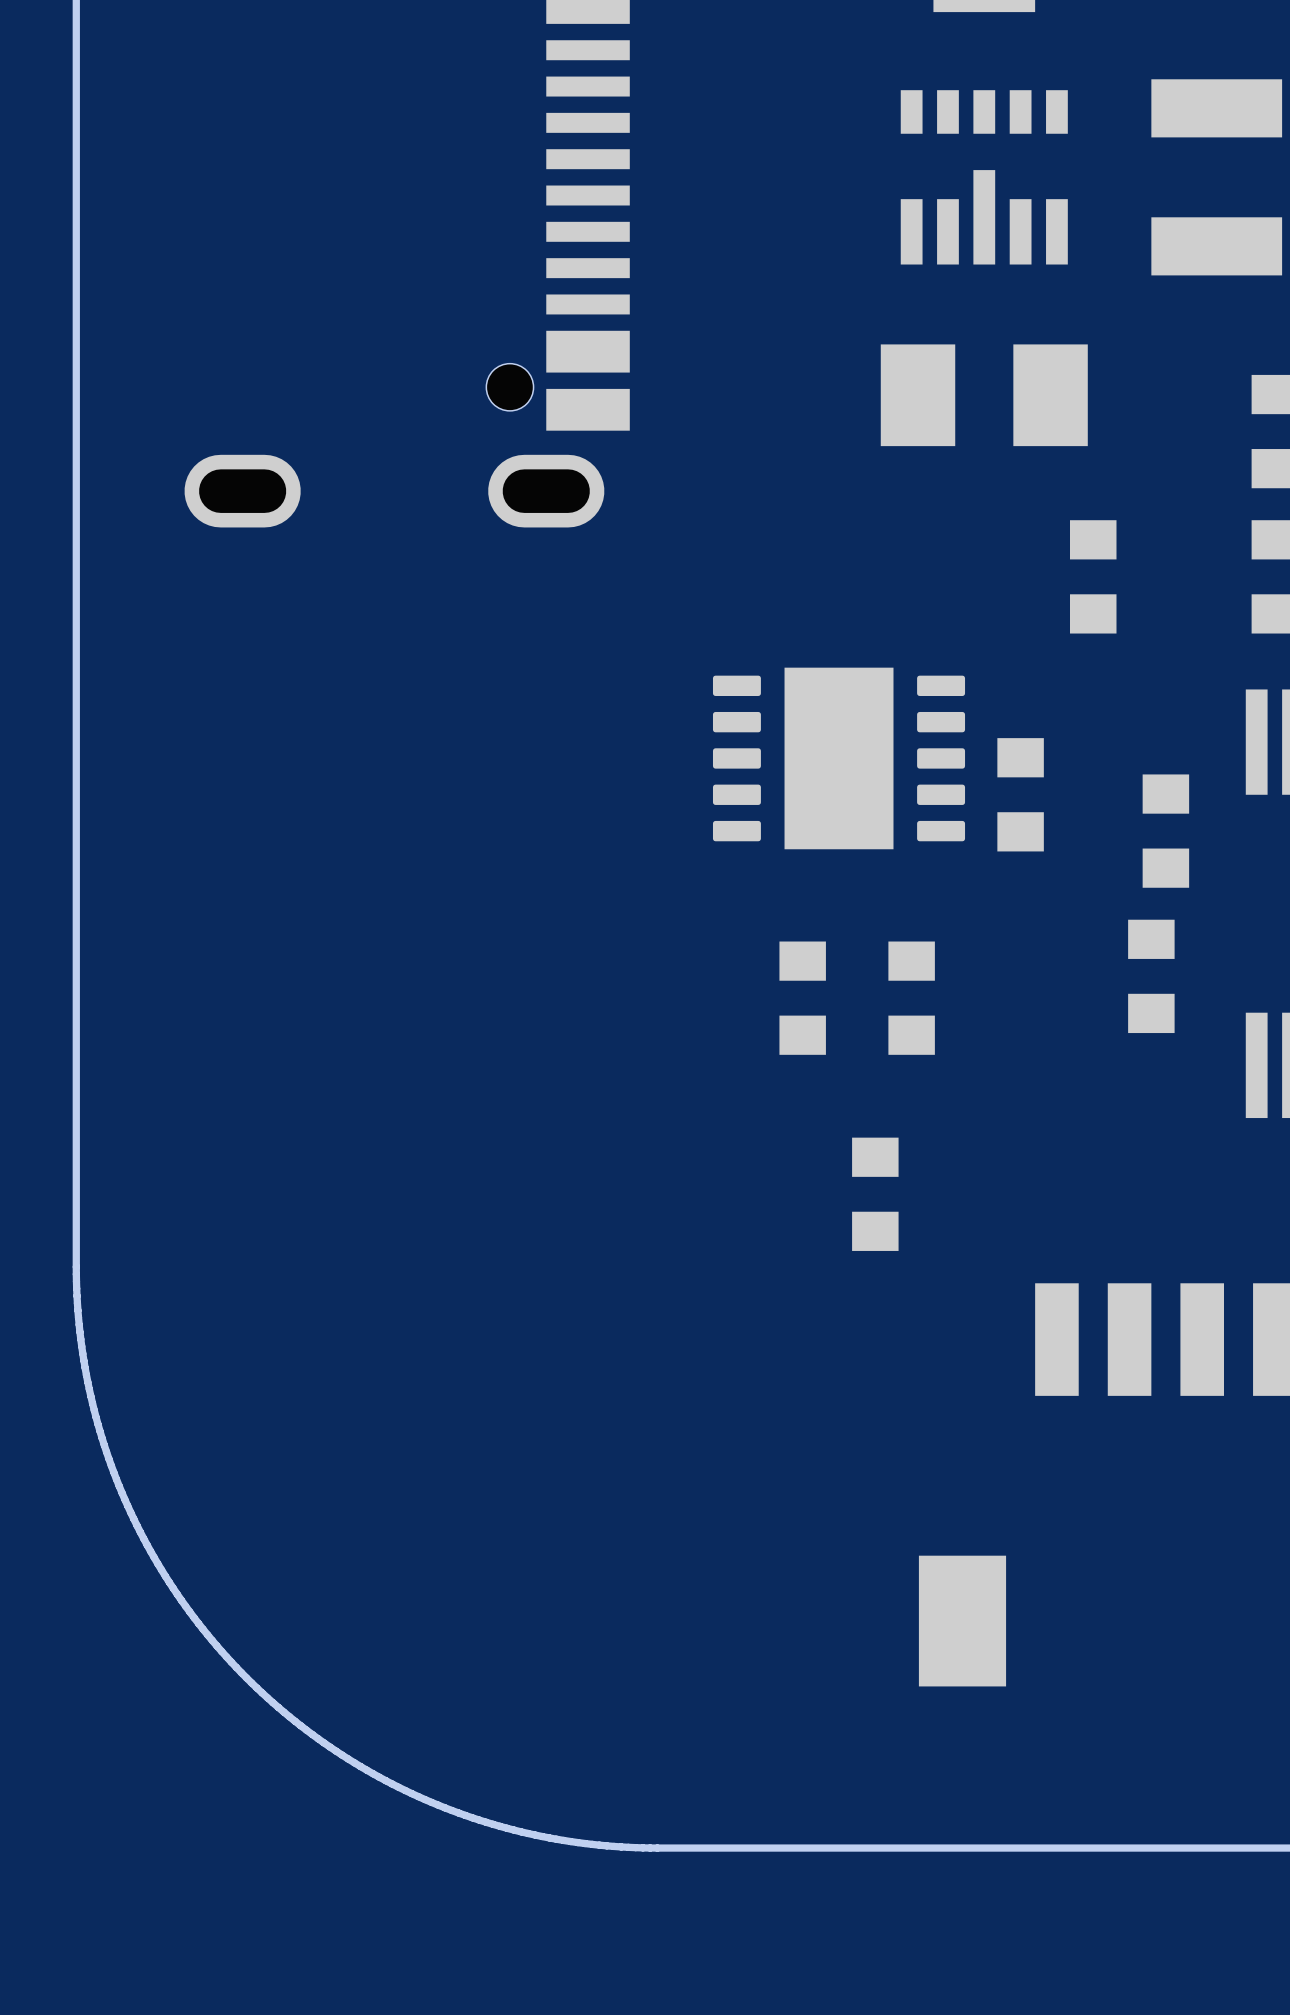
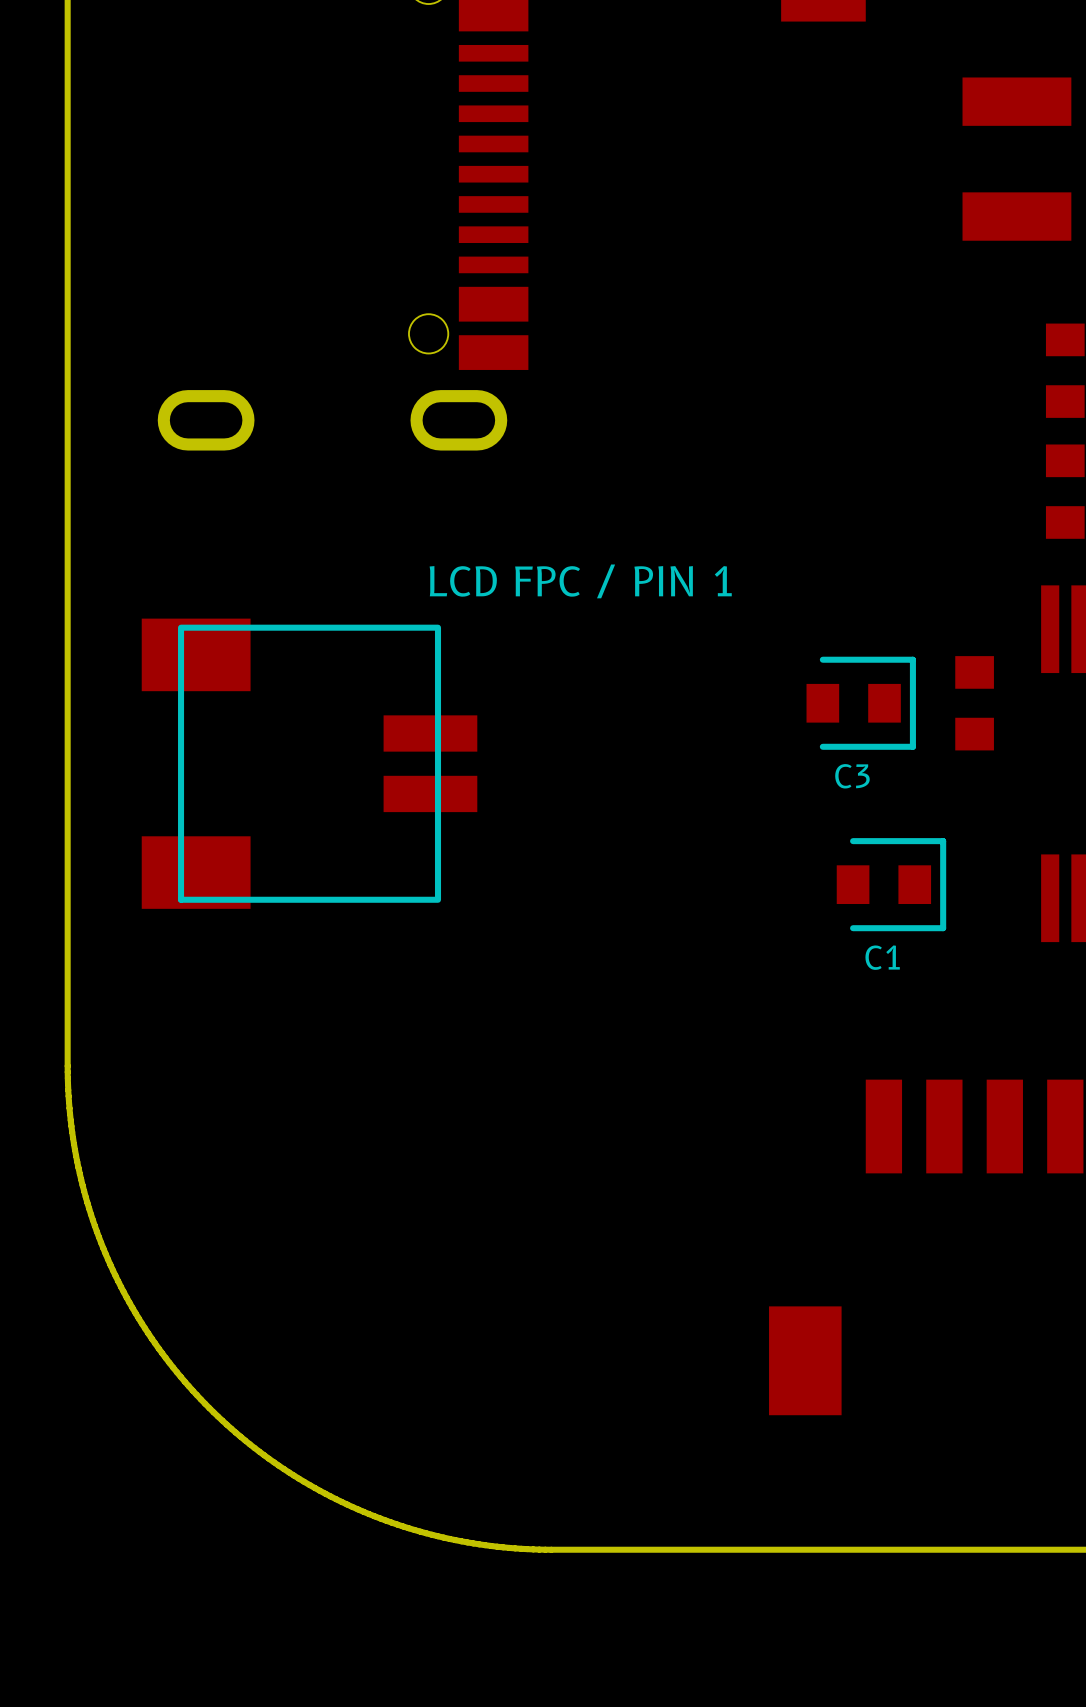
part: (984, 177) -> none
part: (984, 395) -> none
part: (1093, 576) -> none
text: none -> LCD FPC / PIN 1 (580, 581)
part: (839, 758) -> none
part: (1020, 794) -> none
C3: none -> (861, 703)
part: none -> (309, 763)
part: (1151, 976) -> none
part: (802, 998) -> none
part: (911, 998) -> none
C1: none -> (891, 884)
part: (875, 1194) -> none

